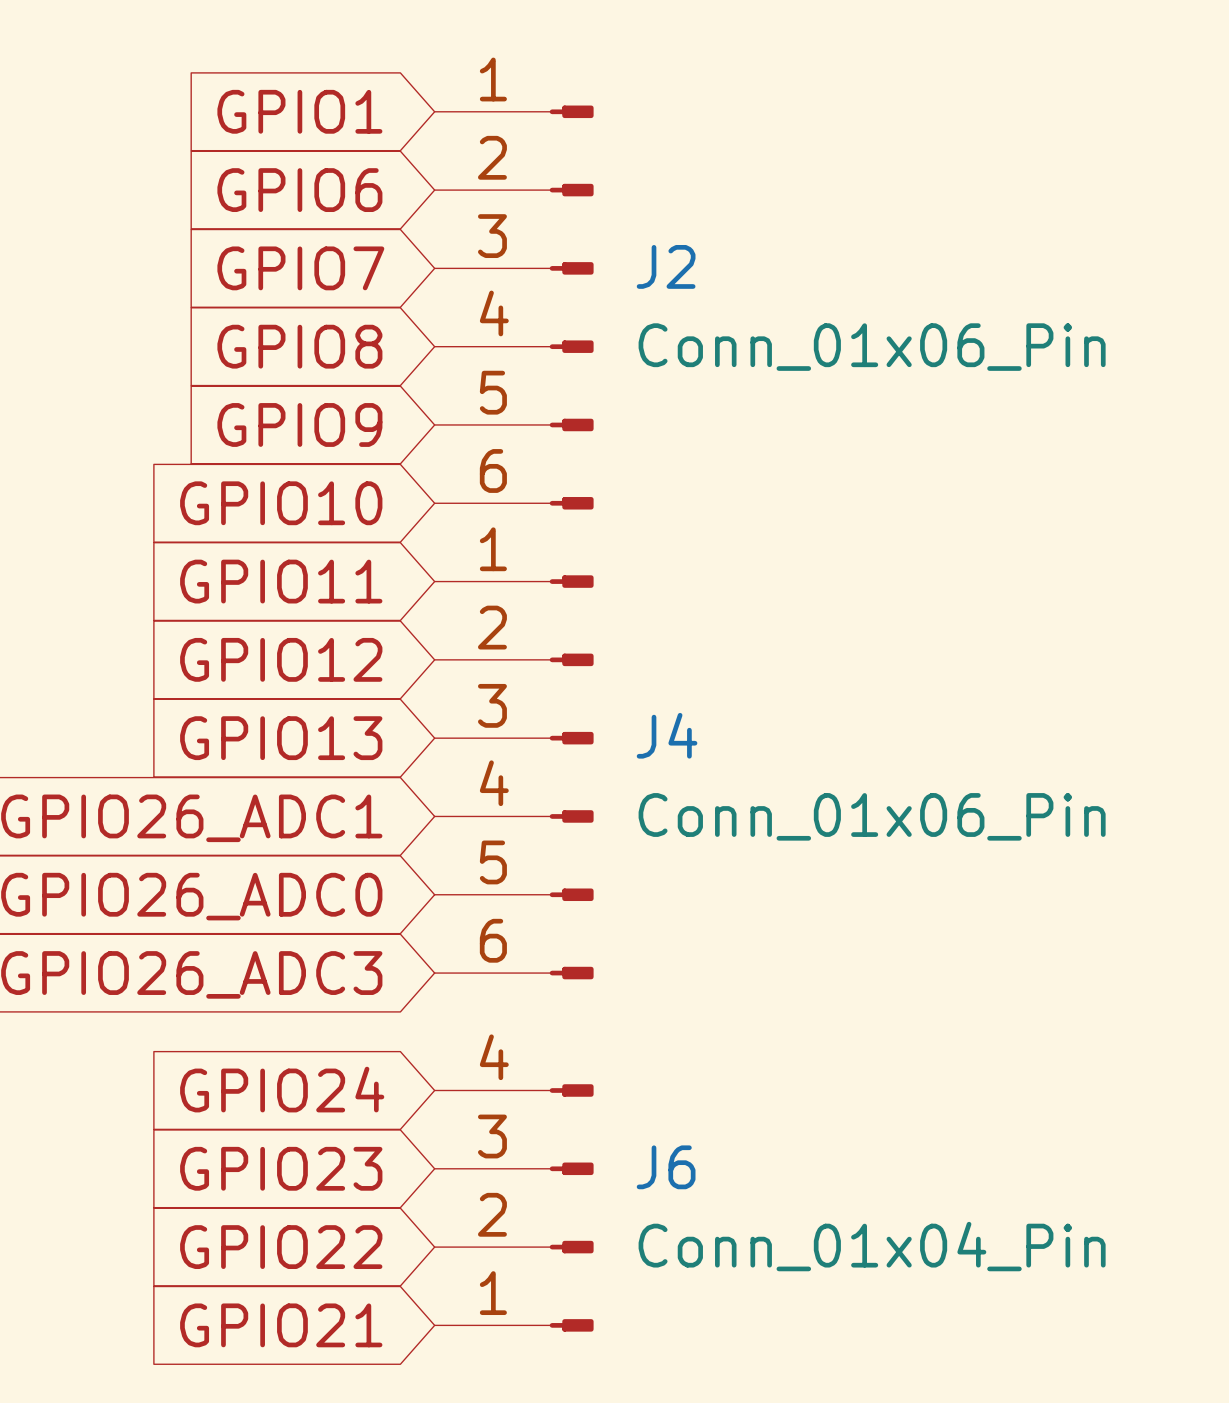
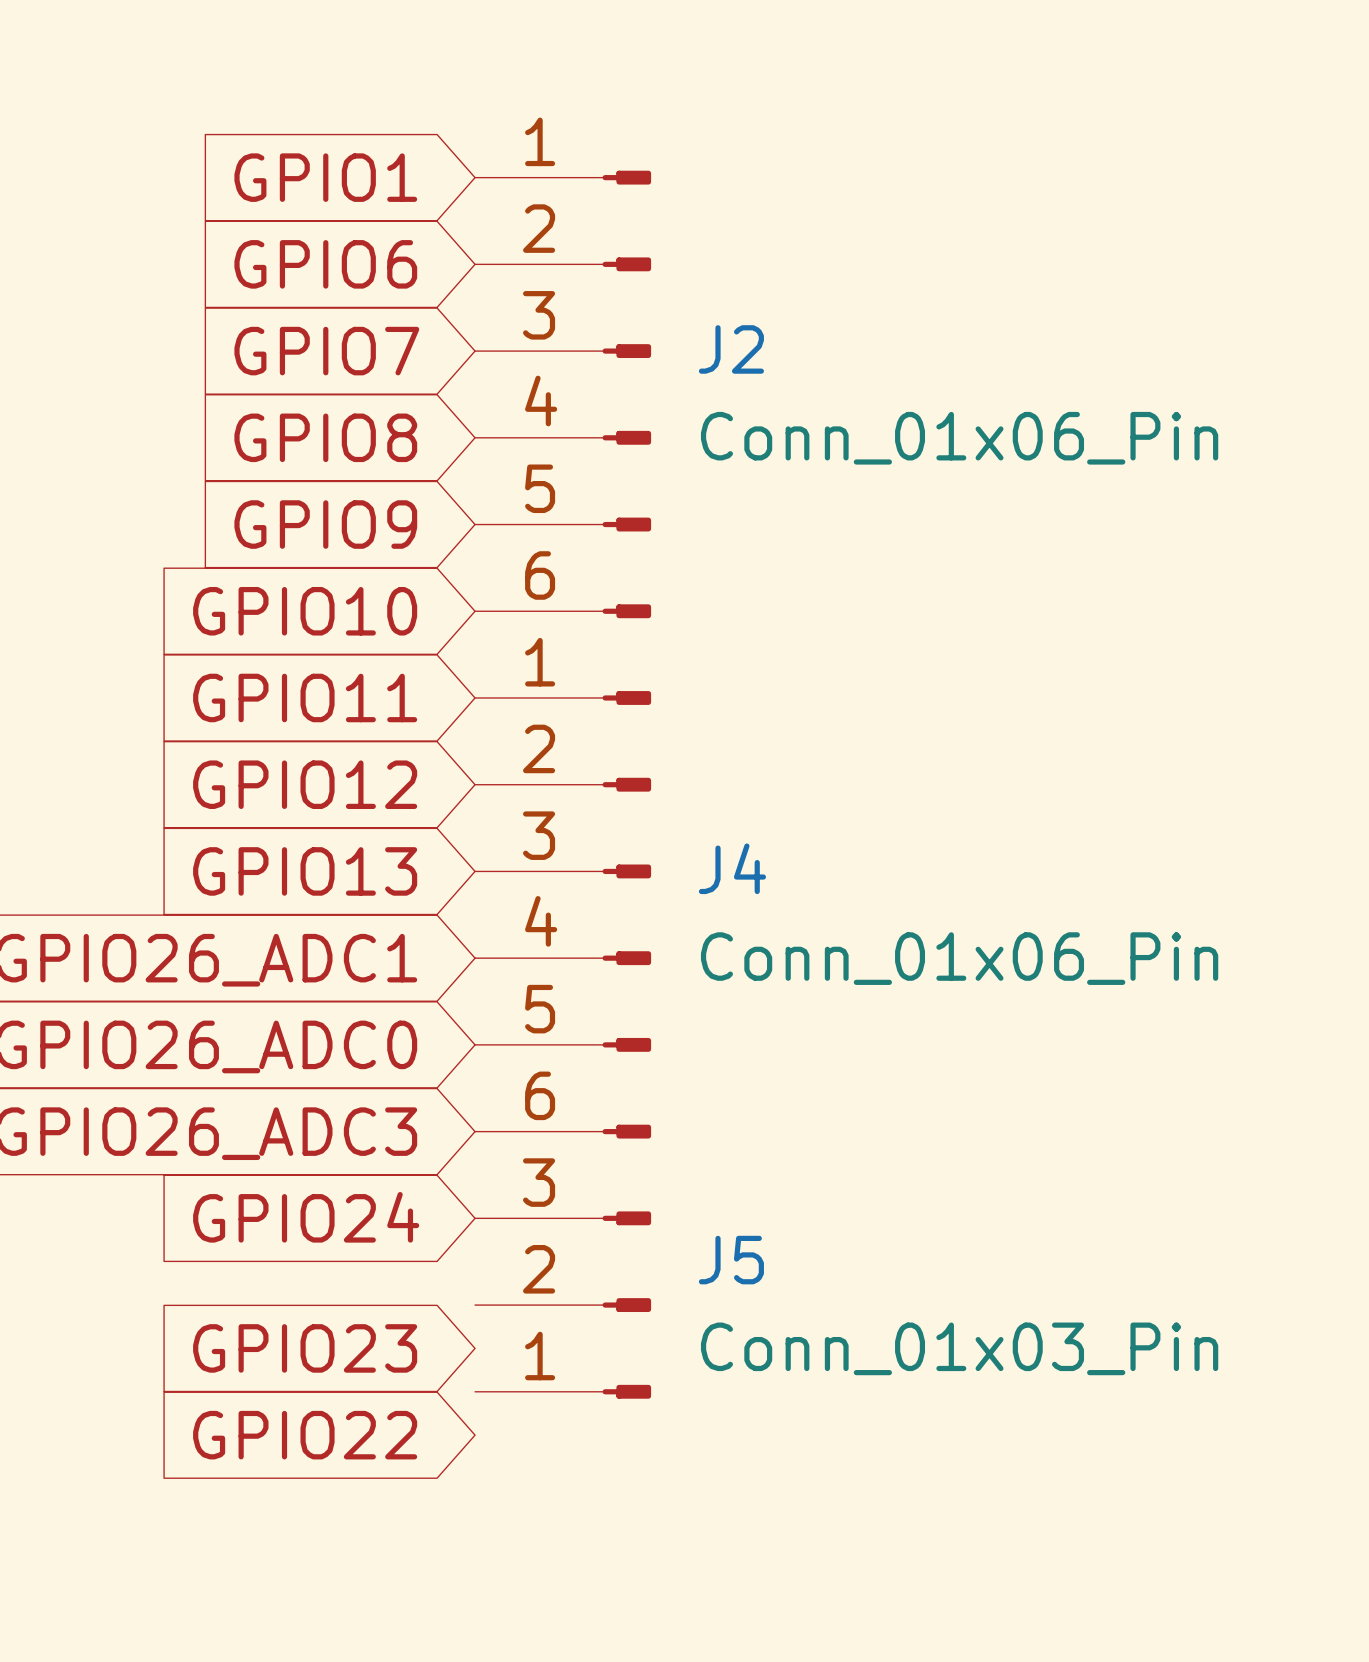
global label position: GPIO24 (282, 1089) -> GPIO24 (306, 1217)
J5: none -> Conn_01x03_Pin (563, 1305)
J6: Conn_01x04_Pin (514, 1207) -> none
global label: GPIO21 (281, 1325) -> none

